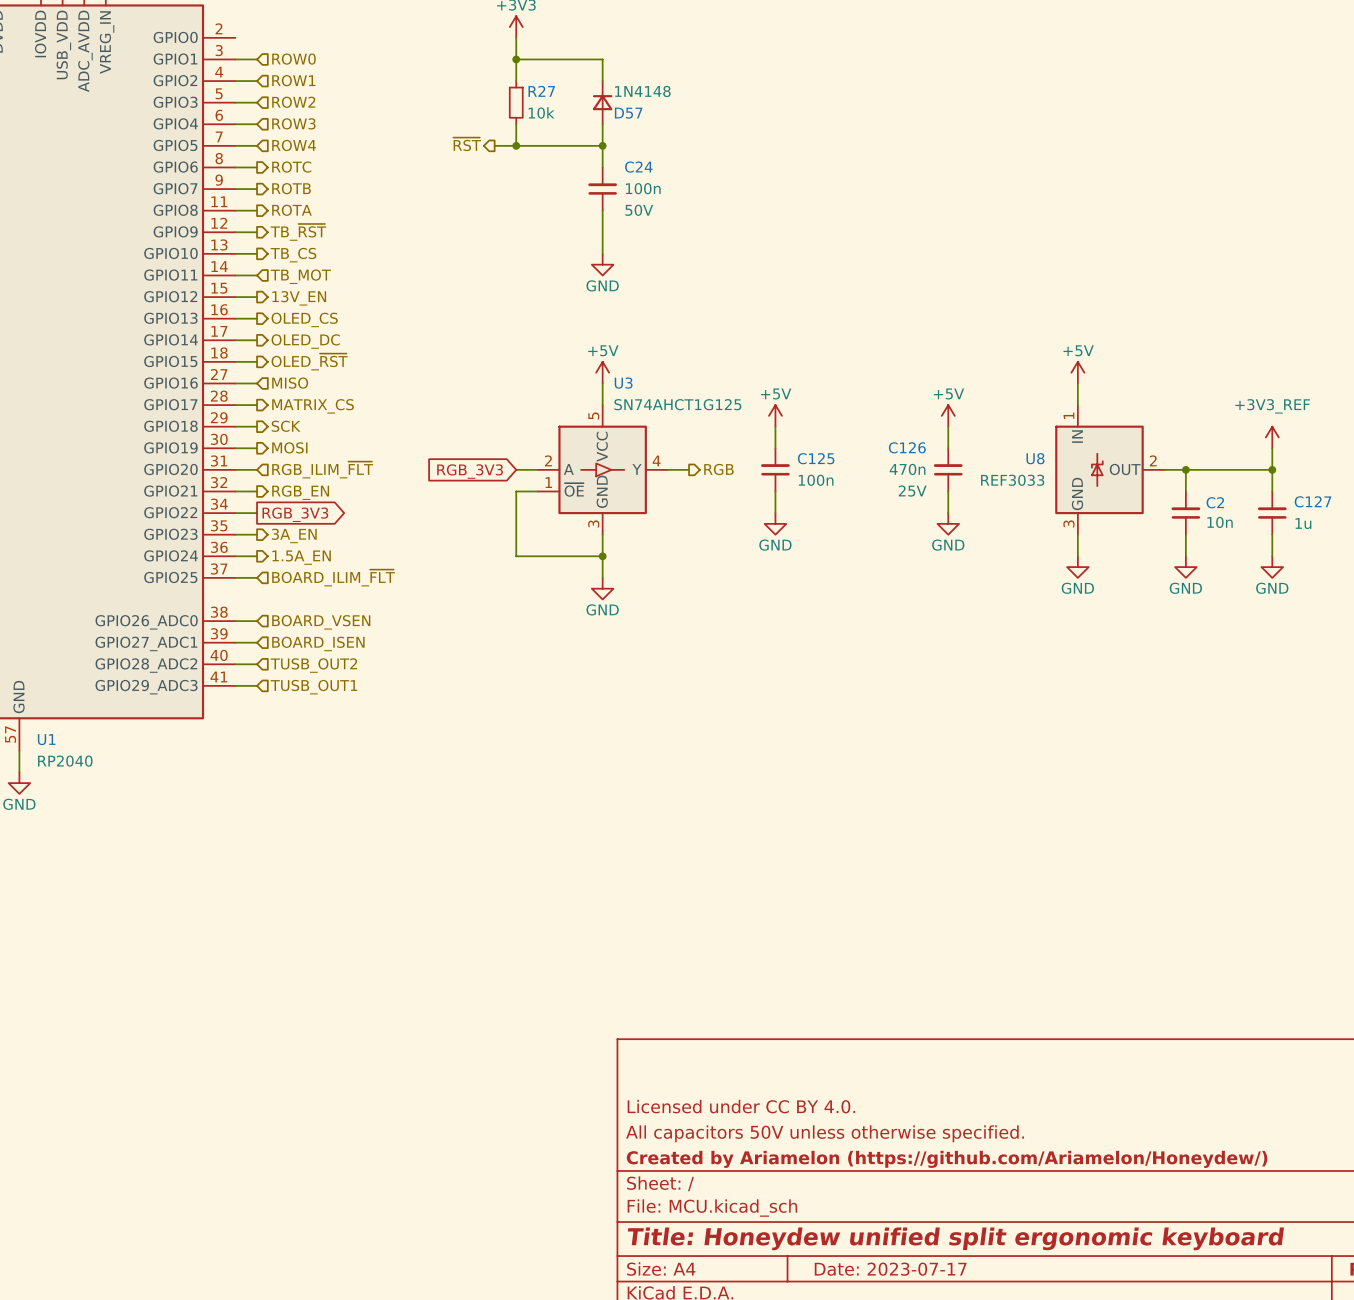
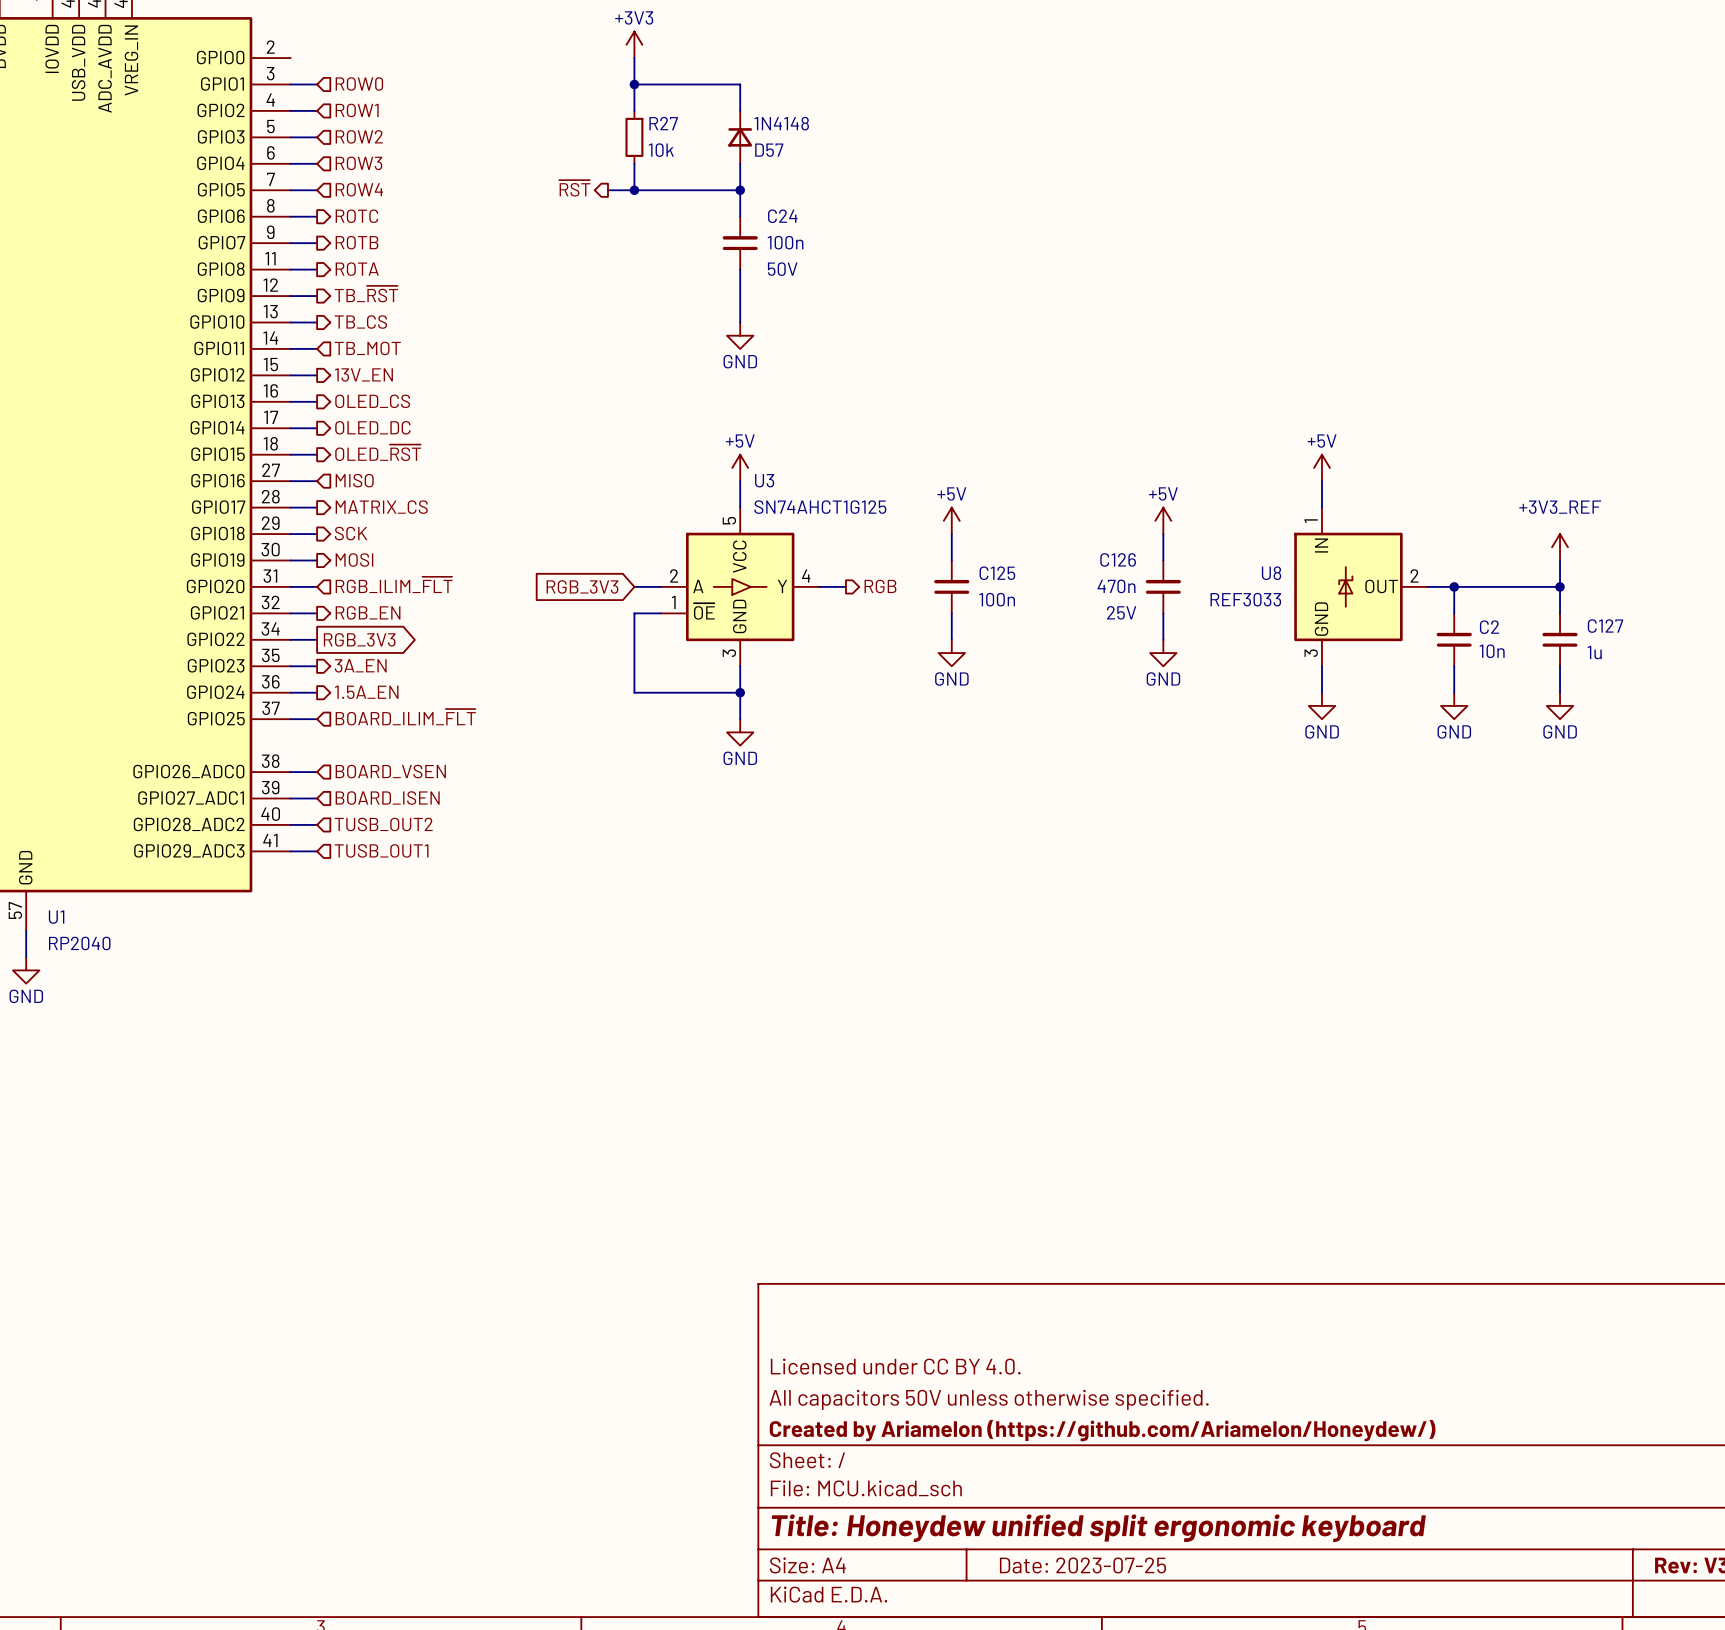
title block: Date: 2023-07-17 (890, 1269) -> Date: 2023-07-25 (1082, 1565)

